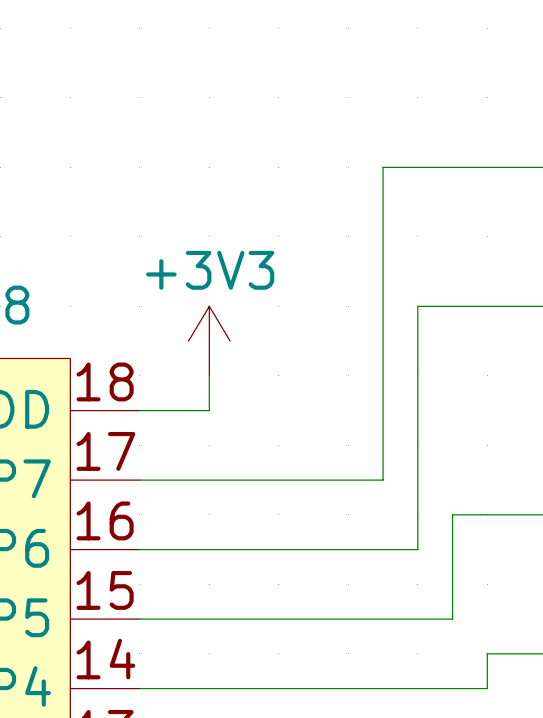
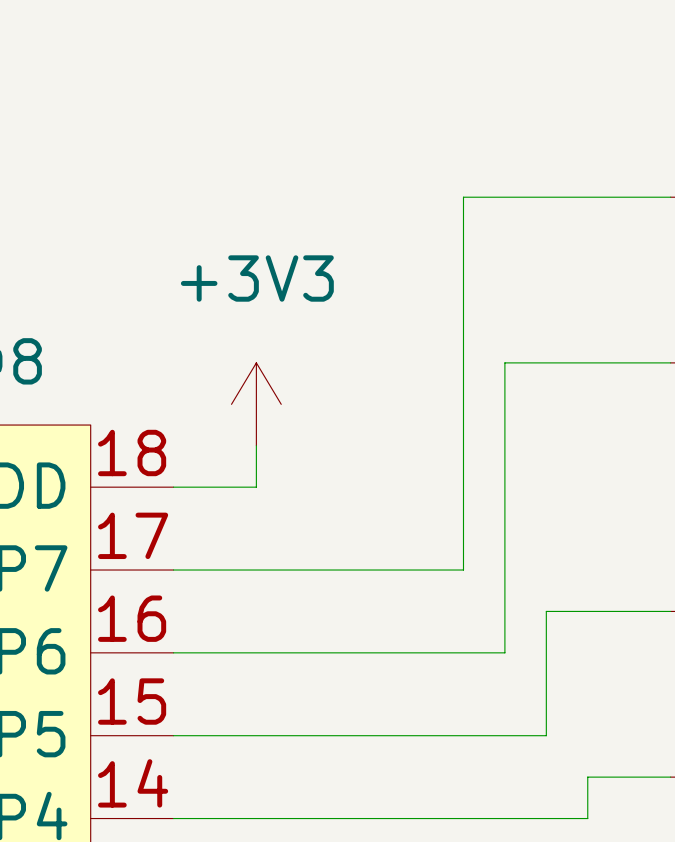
power symbol text position: +3V3 (210, 270) -> +3V3 (257, 278)

